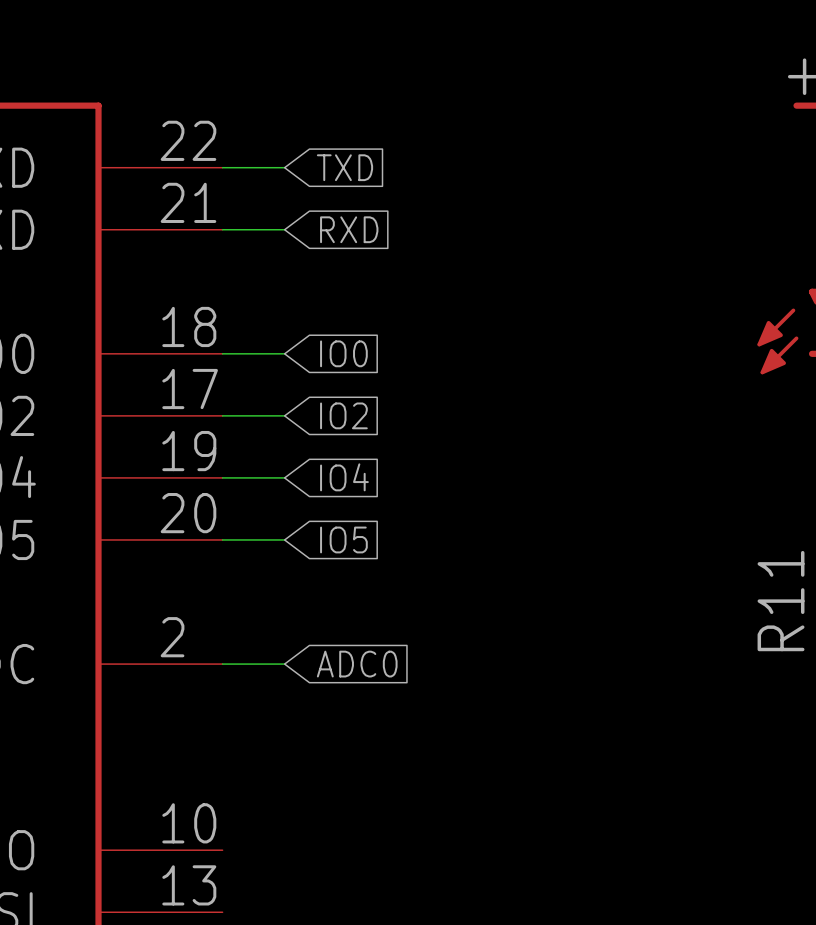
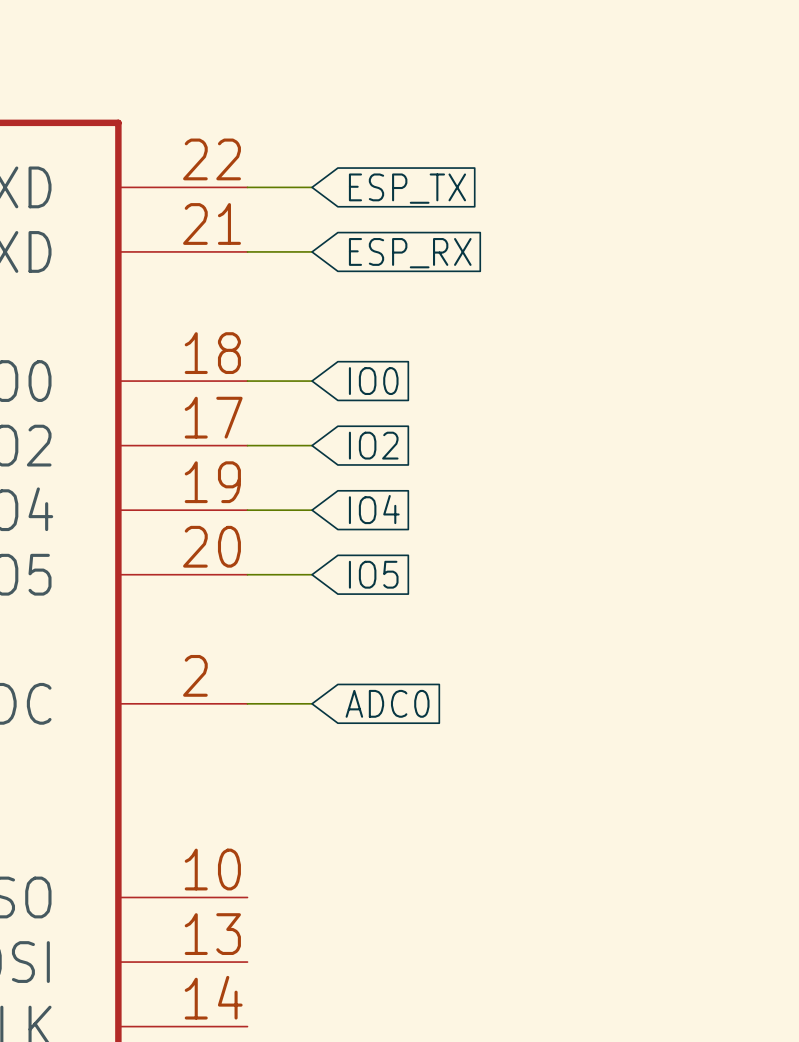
global label: TXD (344, 167) -> ESP_TX (407, 188)
global label: RXD (349, 229) -> ESP_RX (410, 253)

